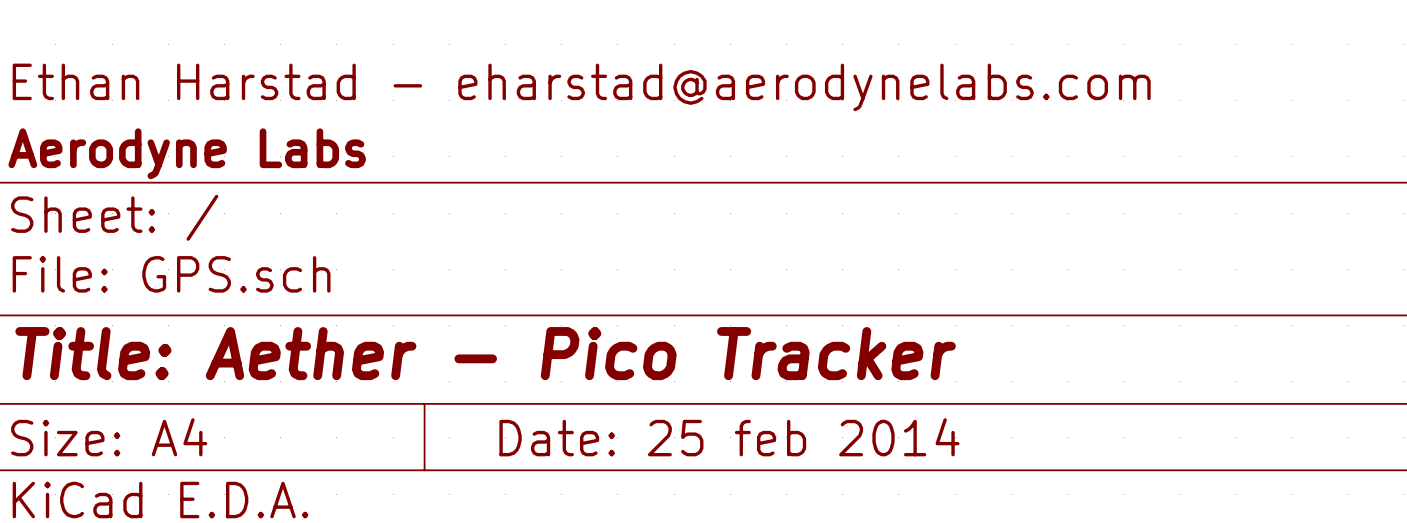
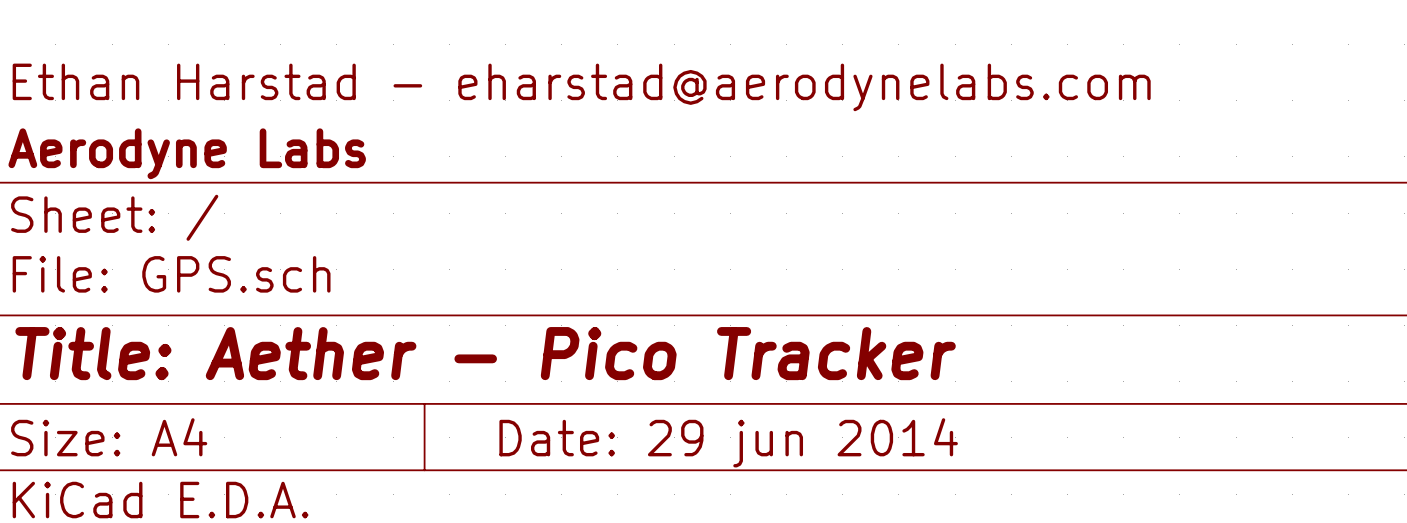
title block: Date: 25 feb 2014 (729, 437) -> Date: 29 jun 2014 (728, 442)

